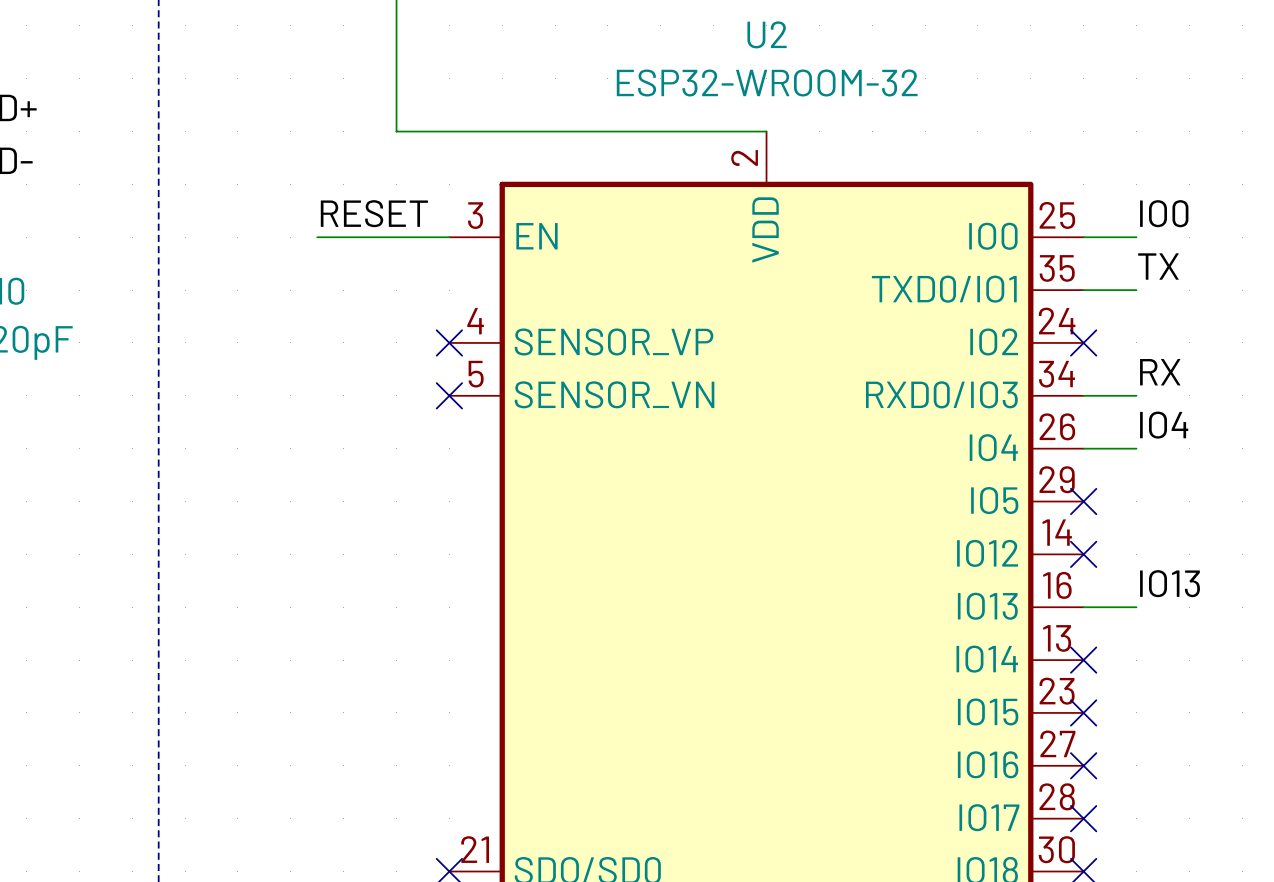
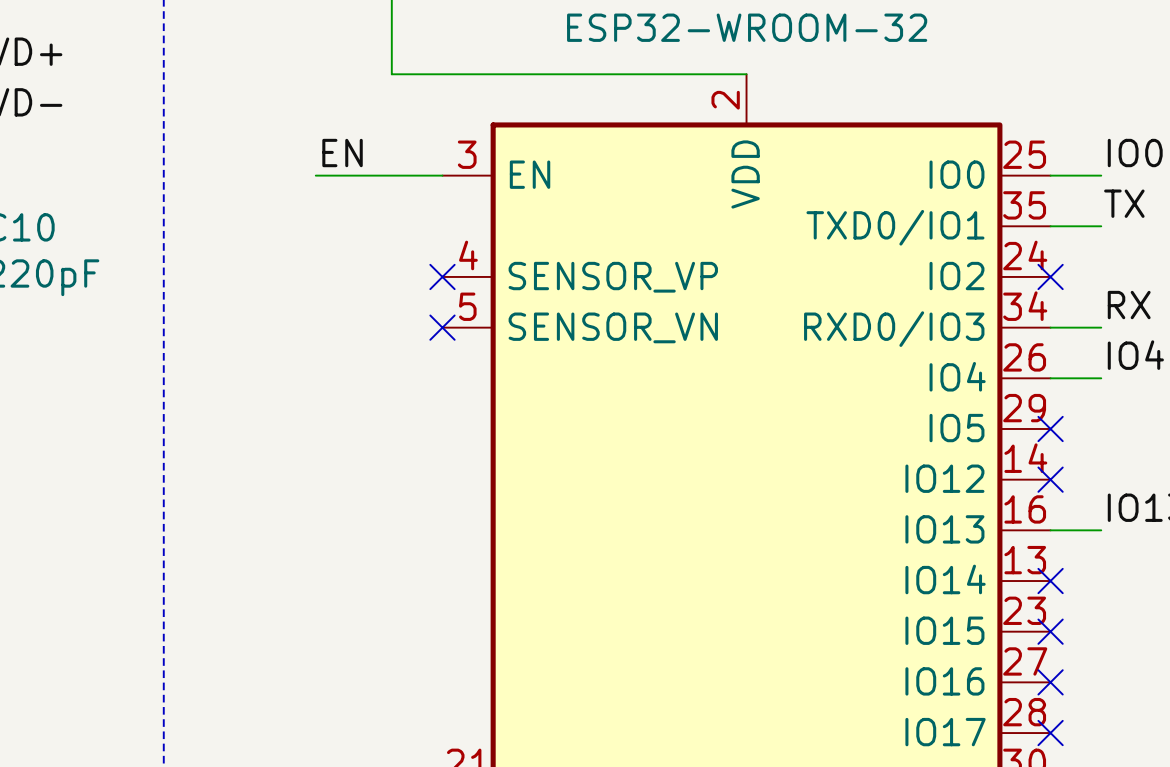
label: RESET (374, 213) -> EN (342, 153)

